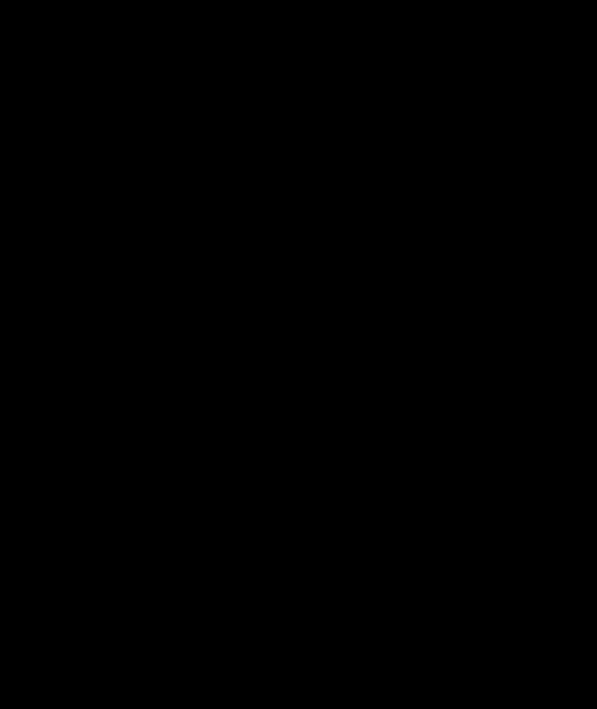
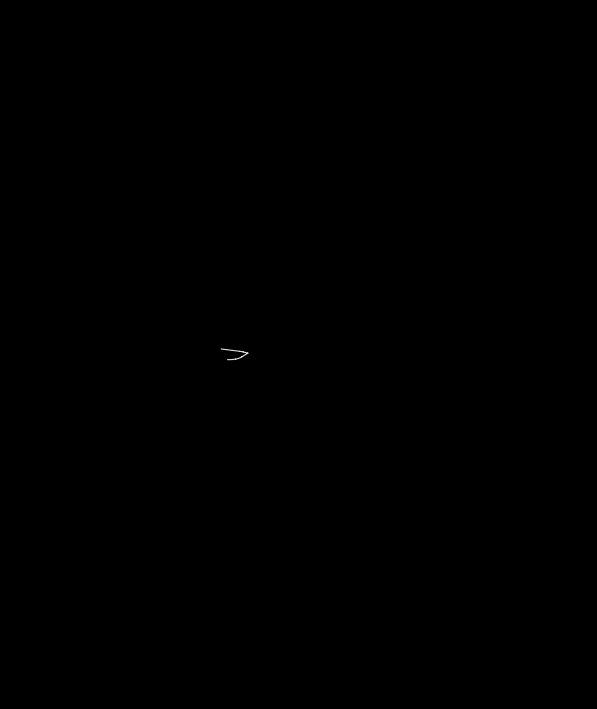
line: none -> (221, 348) (247, 353) (237, 358) (227, 359)

